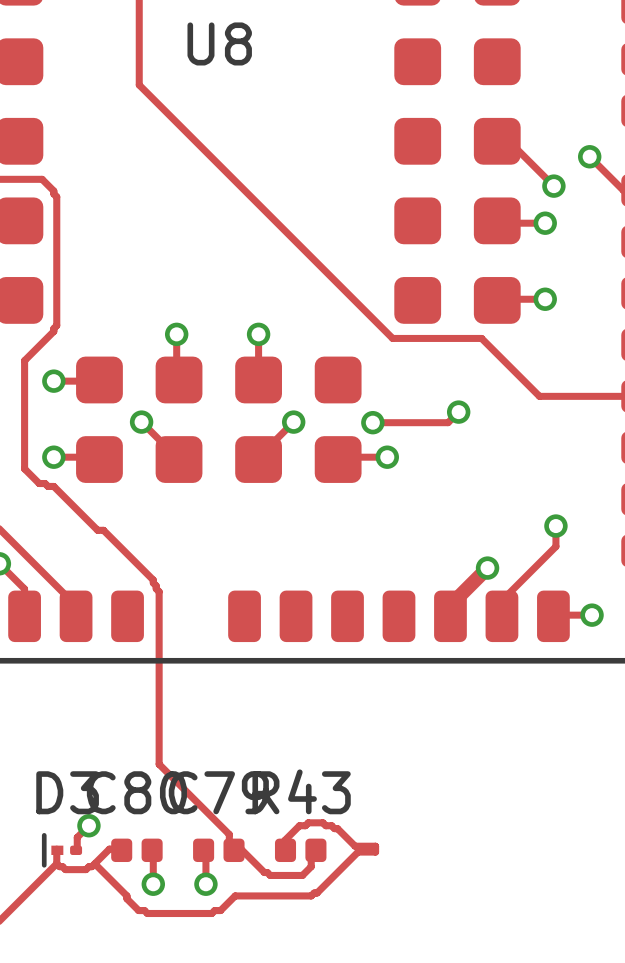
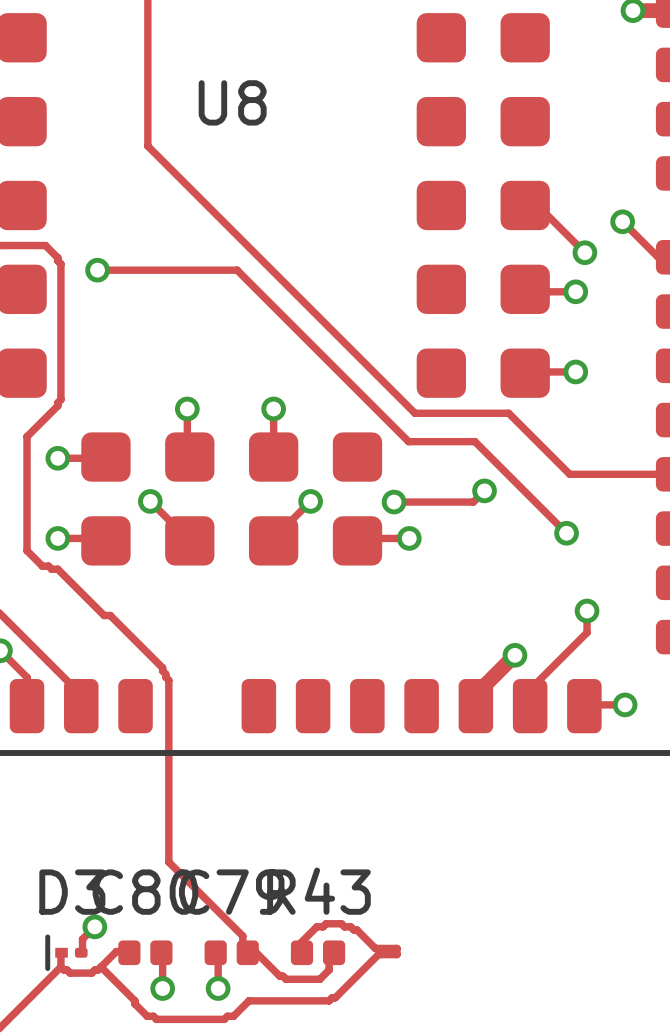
track: none -> (97, 270) (237, 270) (408, 441) (474, 441) (566, 533)
via: none -> (97, 270)
via: none -> (566, 533)

